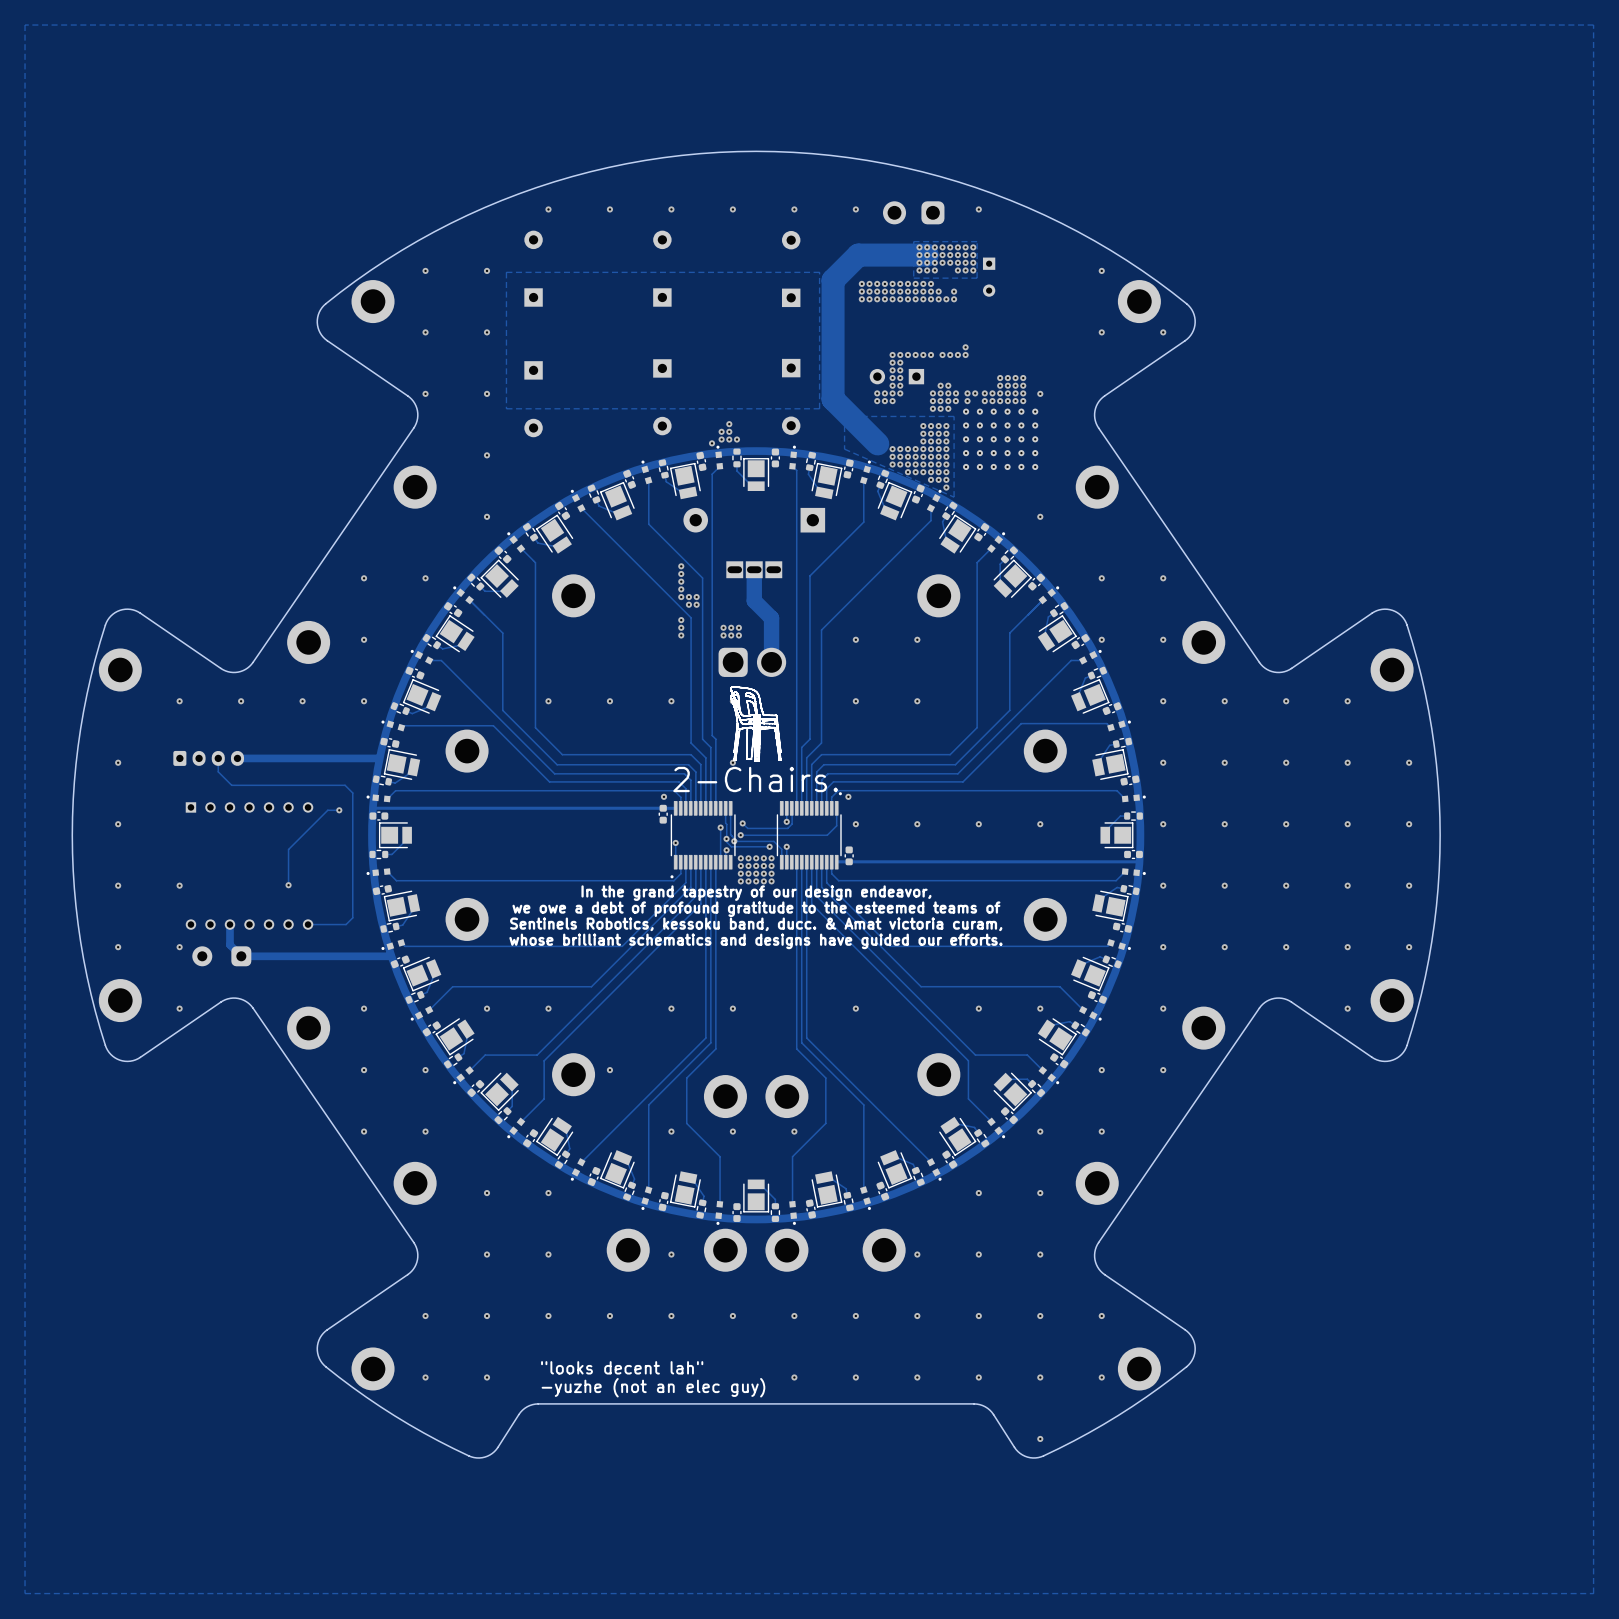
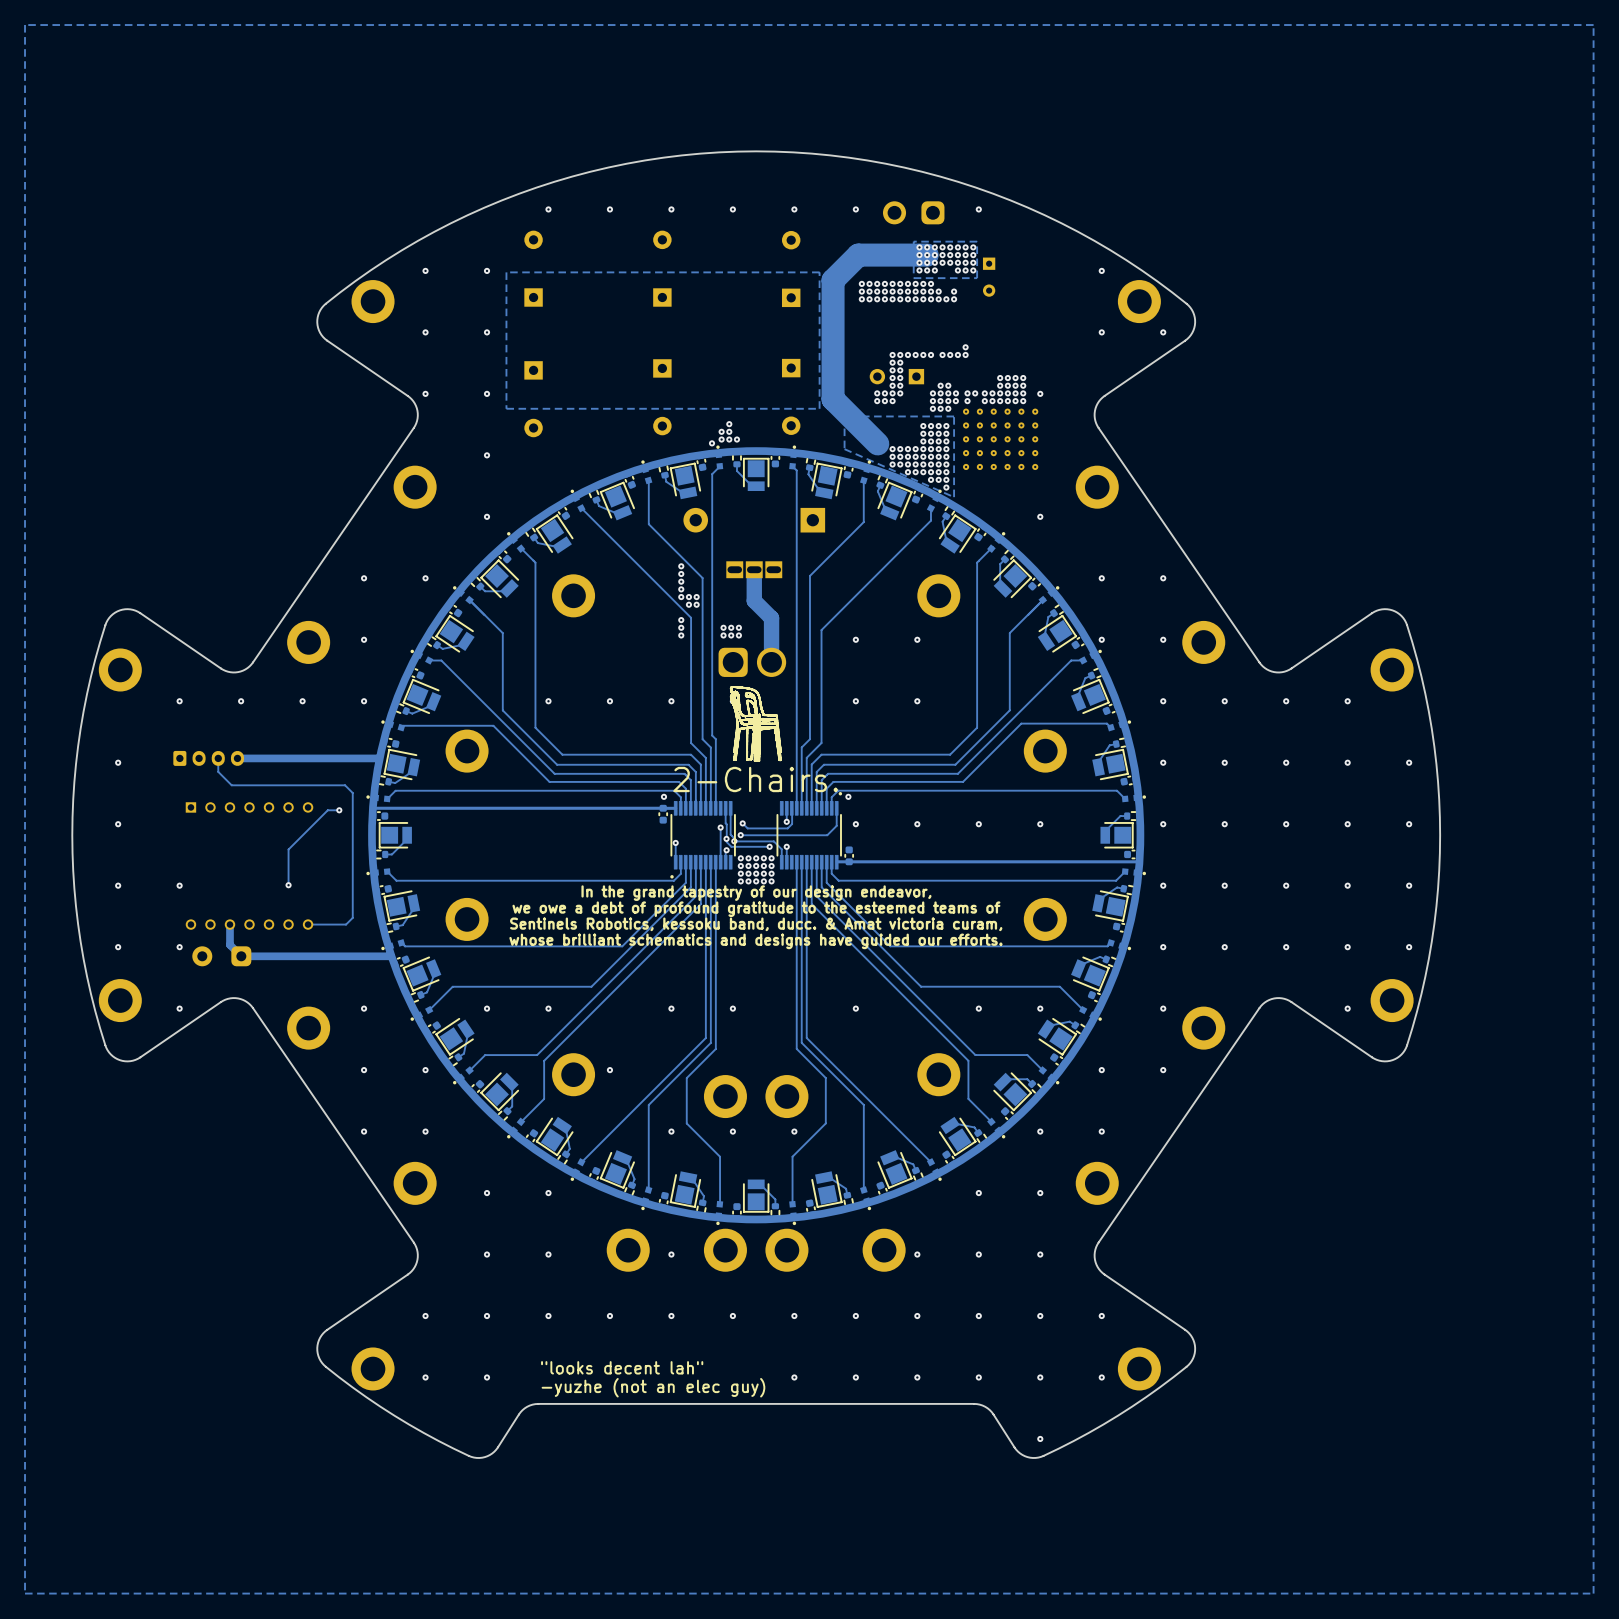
via: (732, 762) -> none

